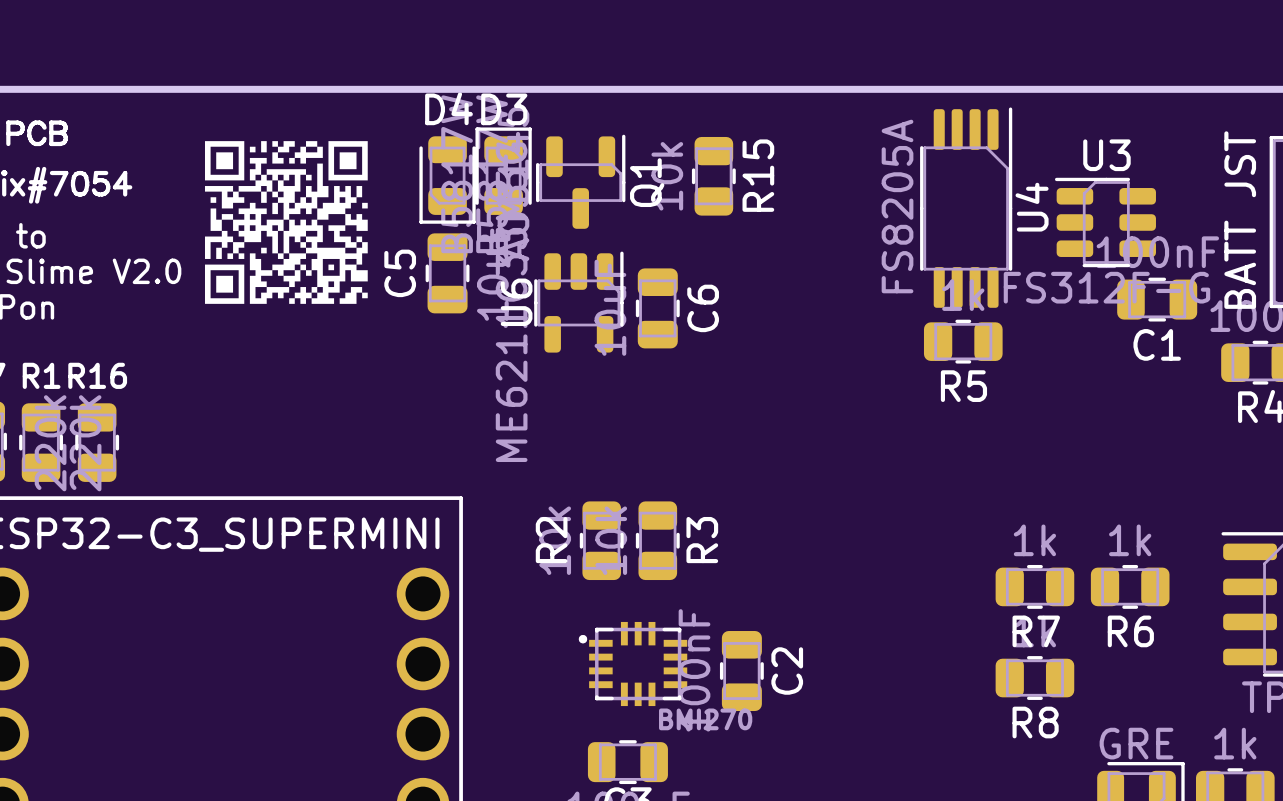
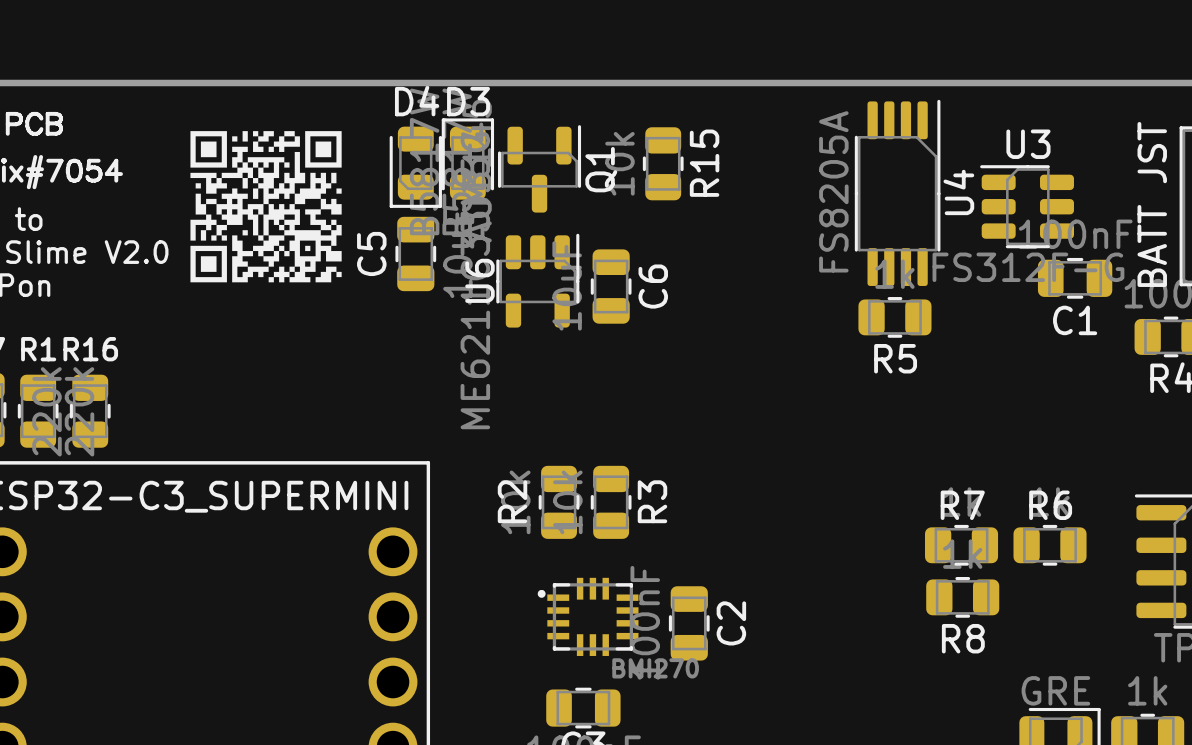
R7 name position: R7 (1036, 631) -> R7 (962, 505)
R6 name position: R6 (1130, 631) -> R6 (1050, 505)
R8 position: (1034, 678) -> (962, 597)

